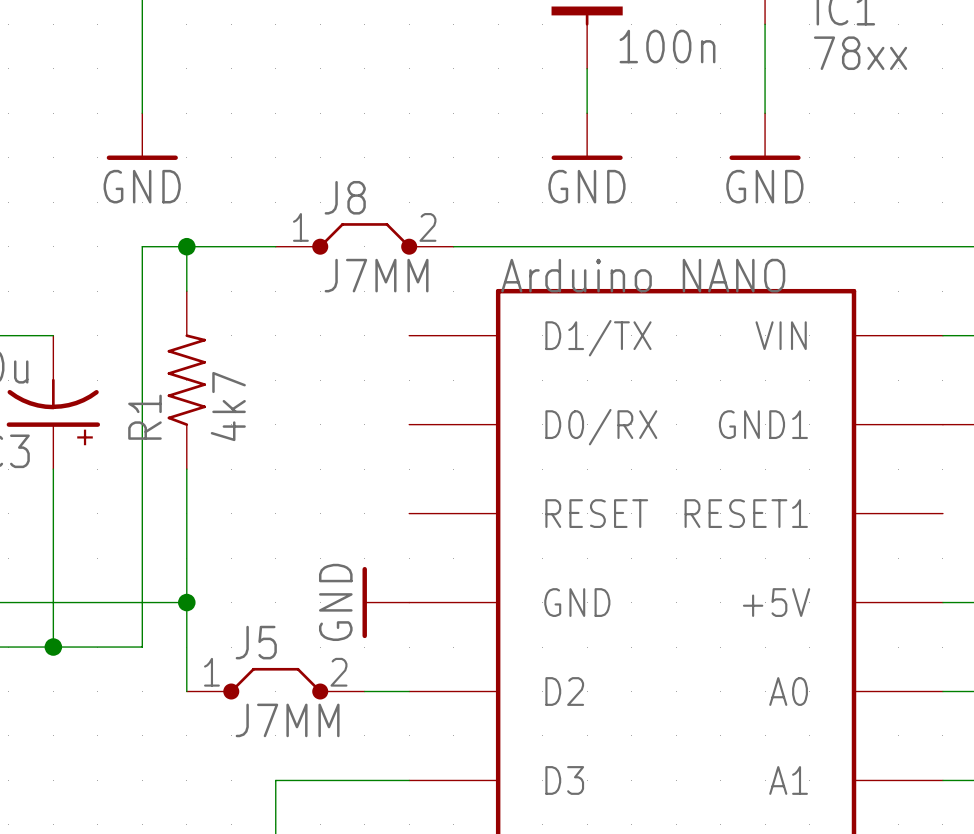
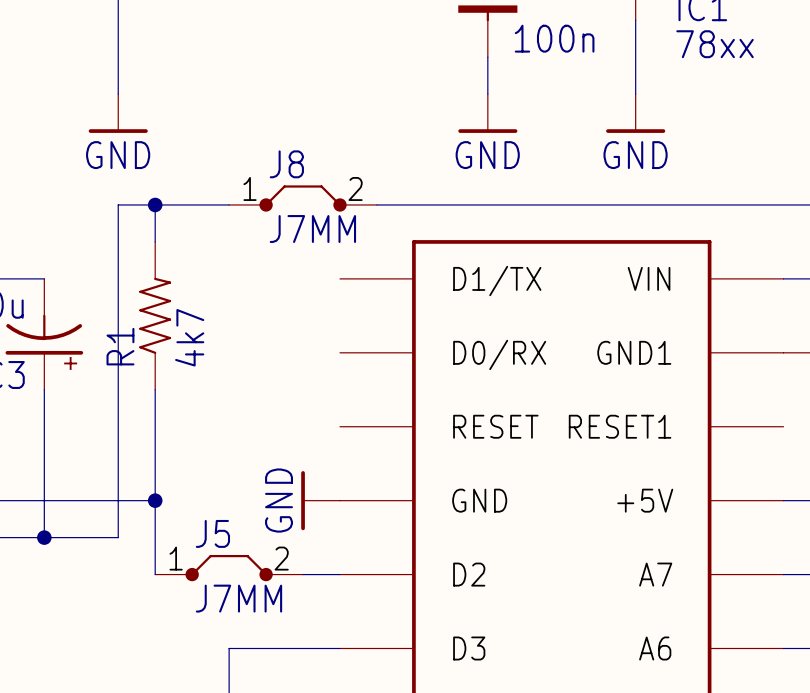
part text: Arduino NANO (643, 275) -> none
part pin name: A0 (788, 691) -> A7 (655, 574)
part pin name: A1 (788, 780) -> A6 (655, 648)

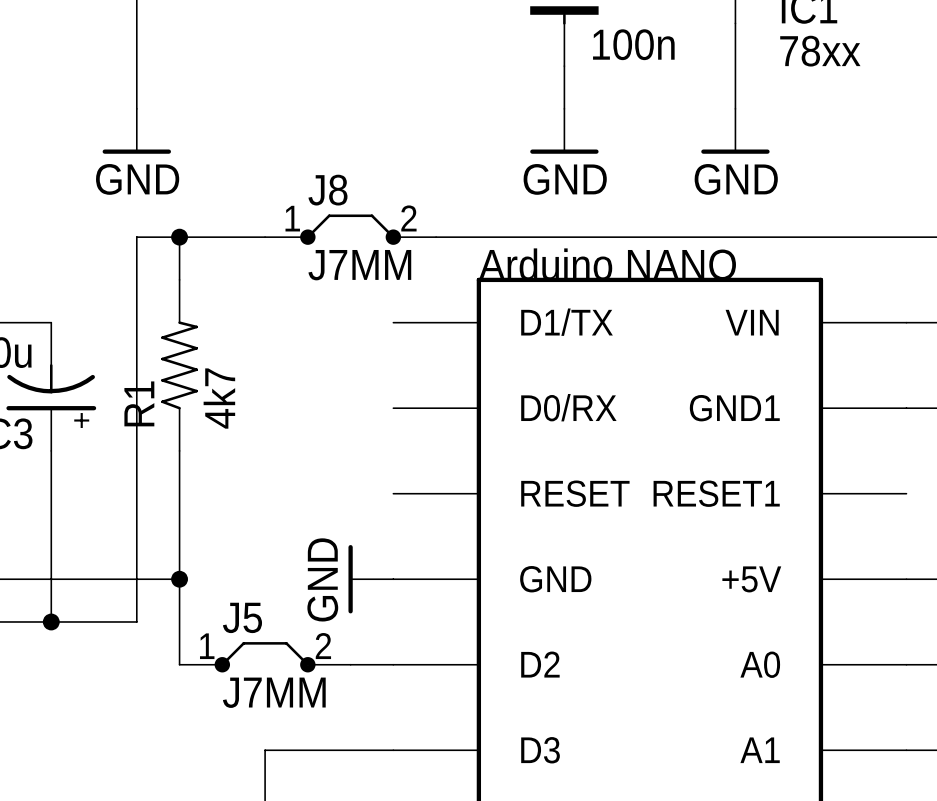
part text: none -> Arduino NANO (607, 264)
part pin name: A7 (655, 574) -> A0 (760, 664)
part pin name: A6 (655, 648) -> A1 (760, 750)

